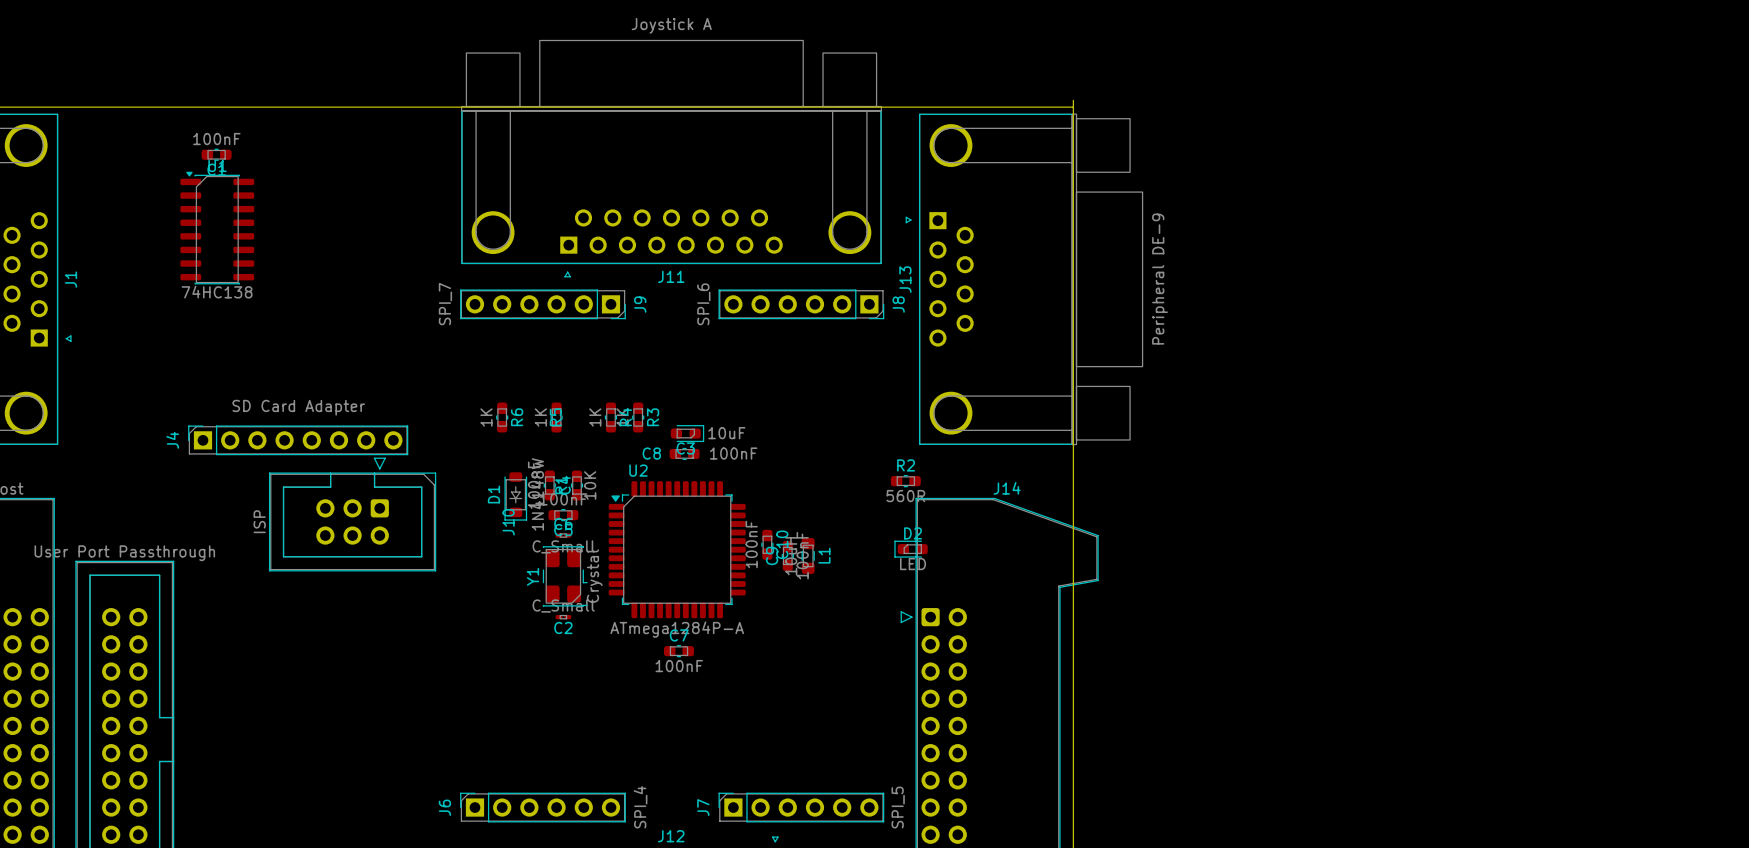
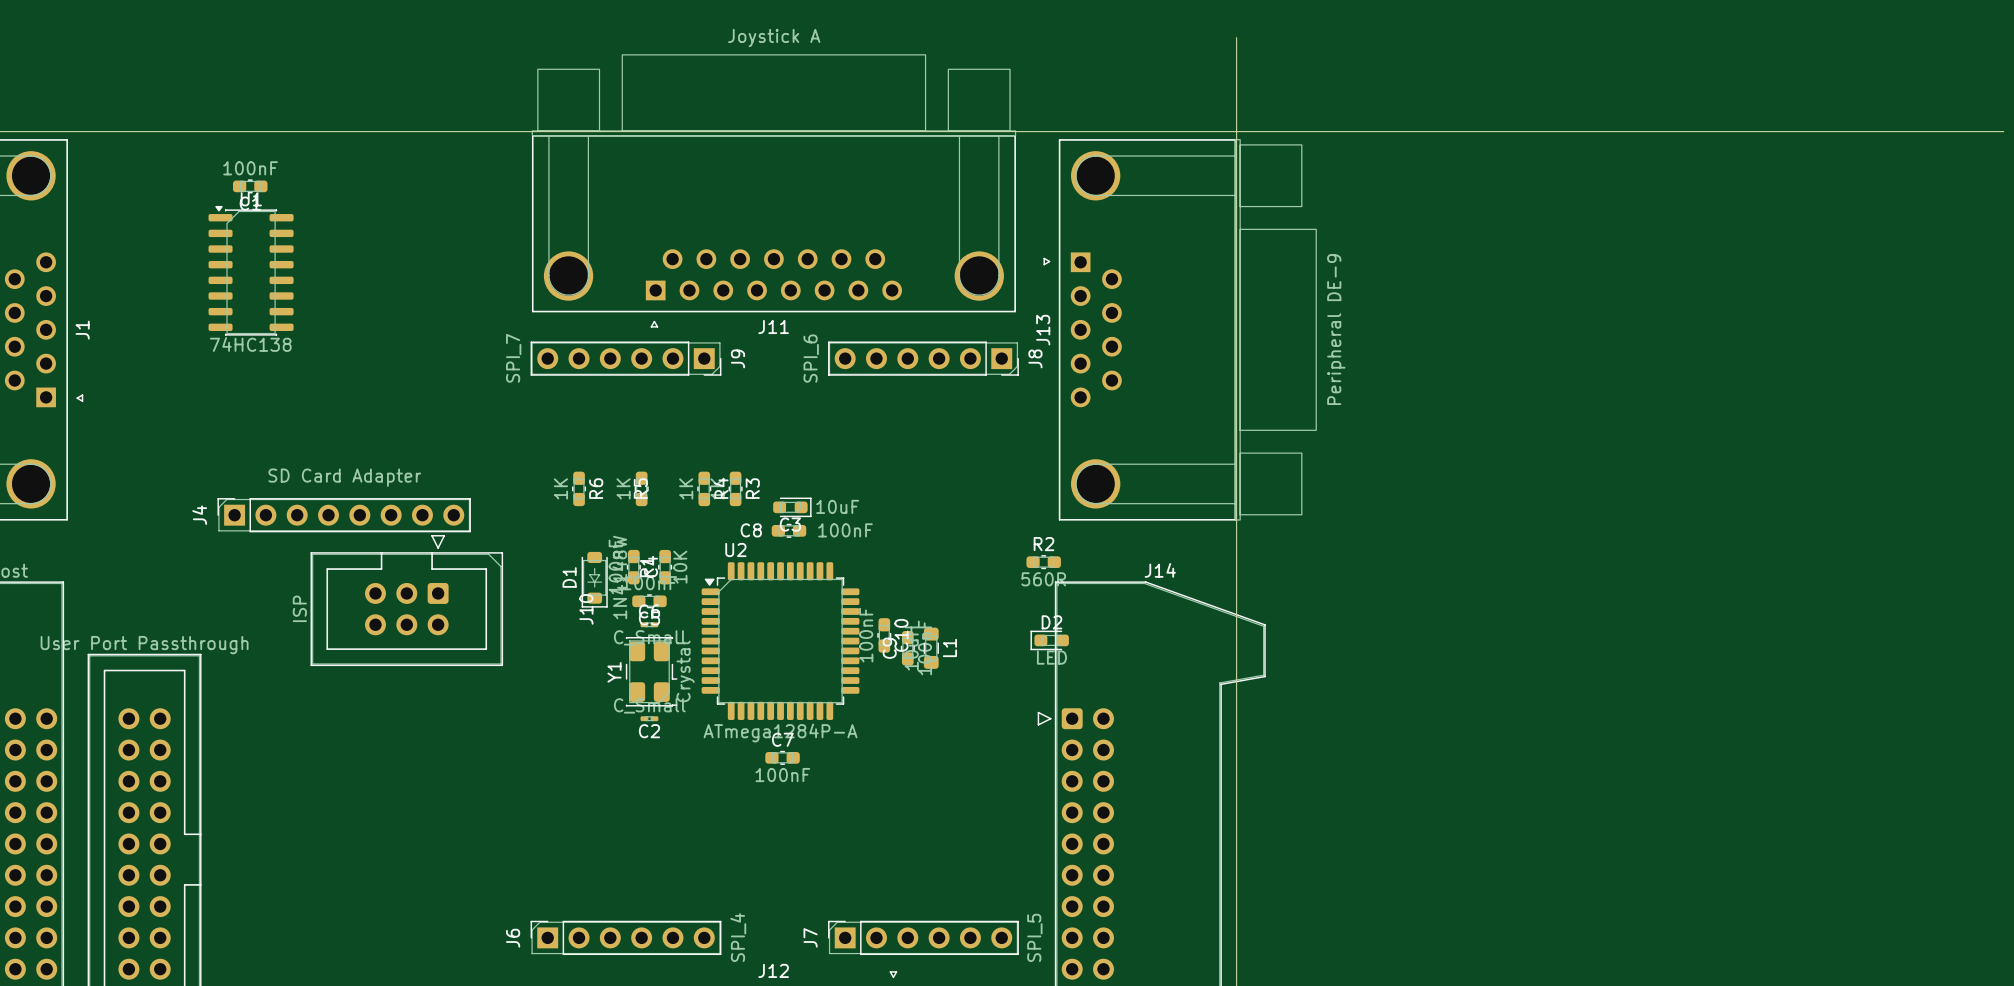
board edge: none -> (1236, 37) (1236, 123)
board edge: none -> (1236, 131) (2003, 131)

